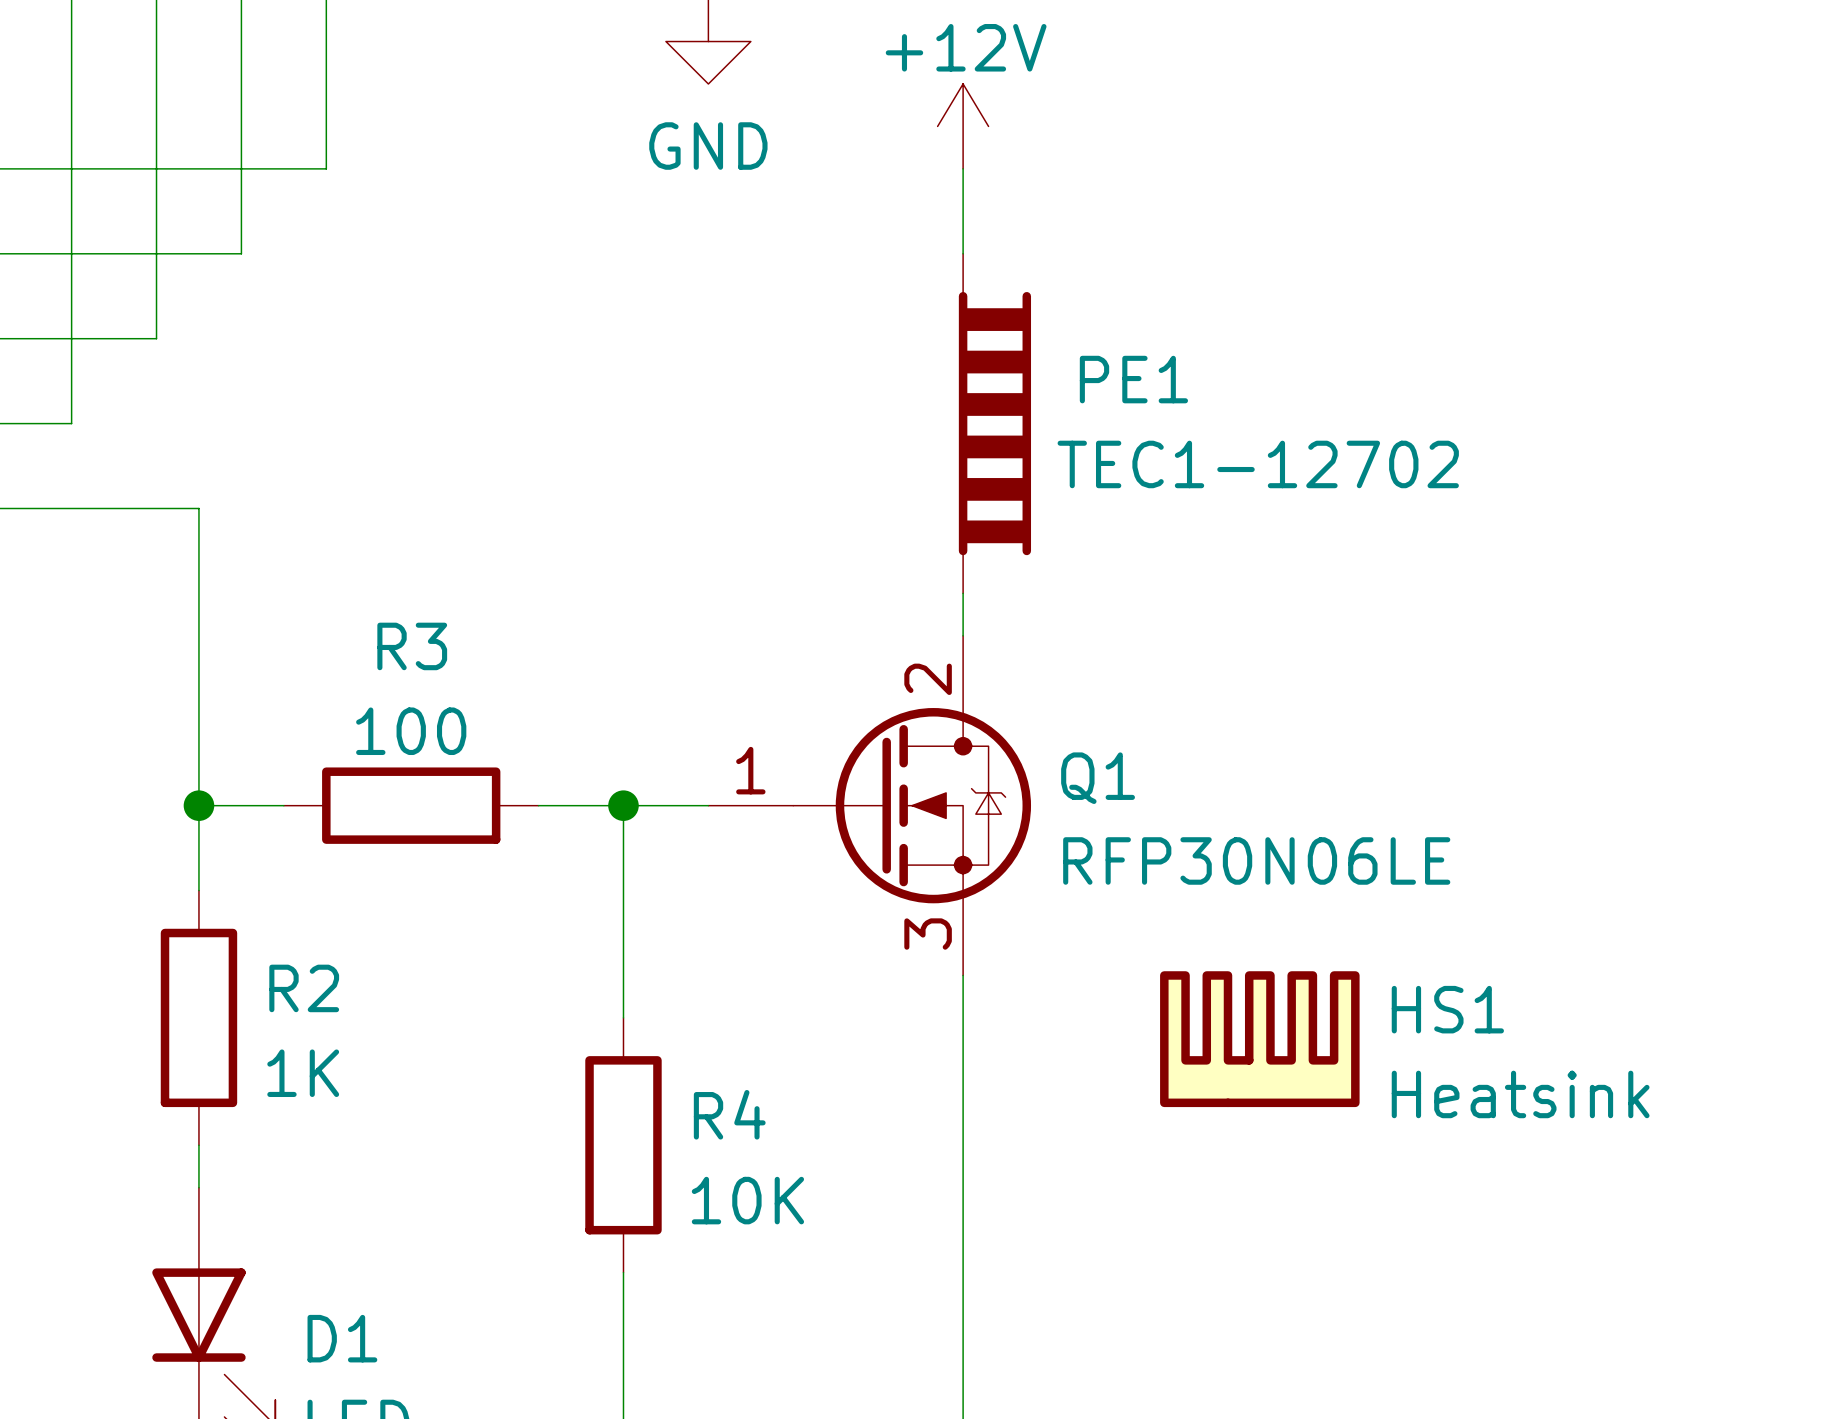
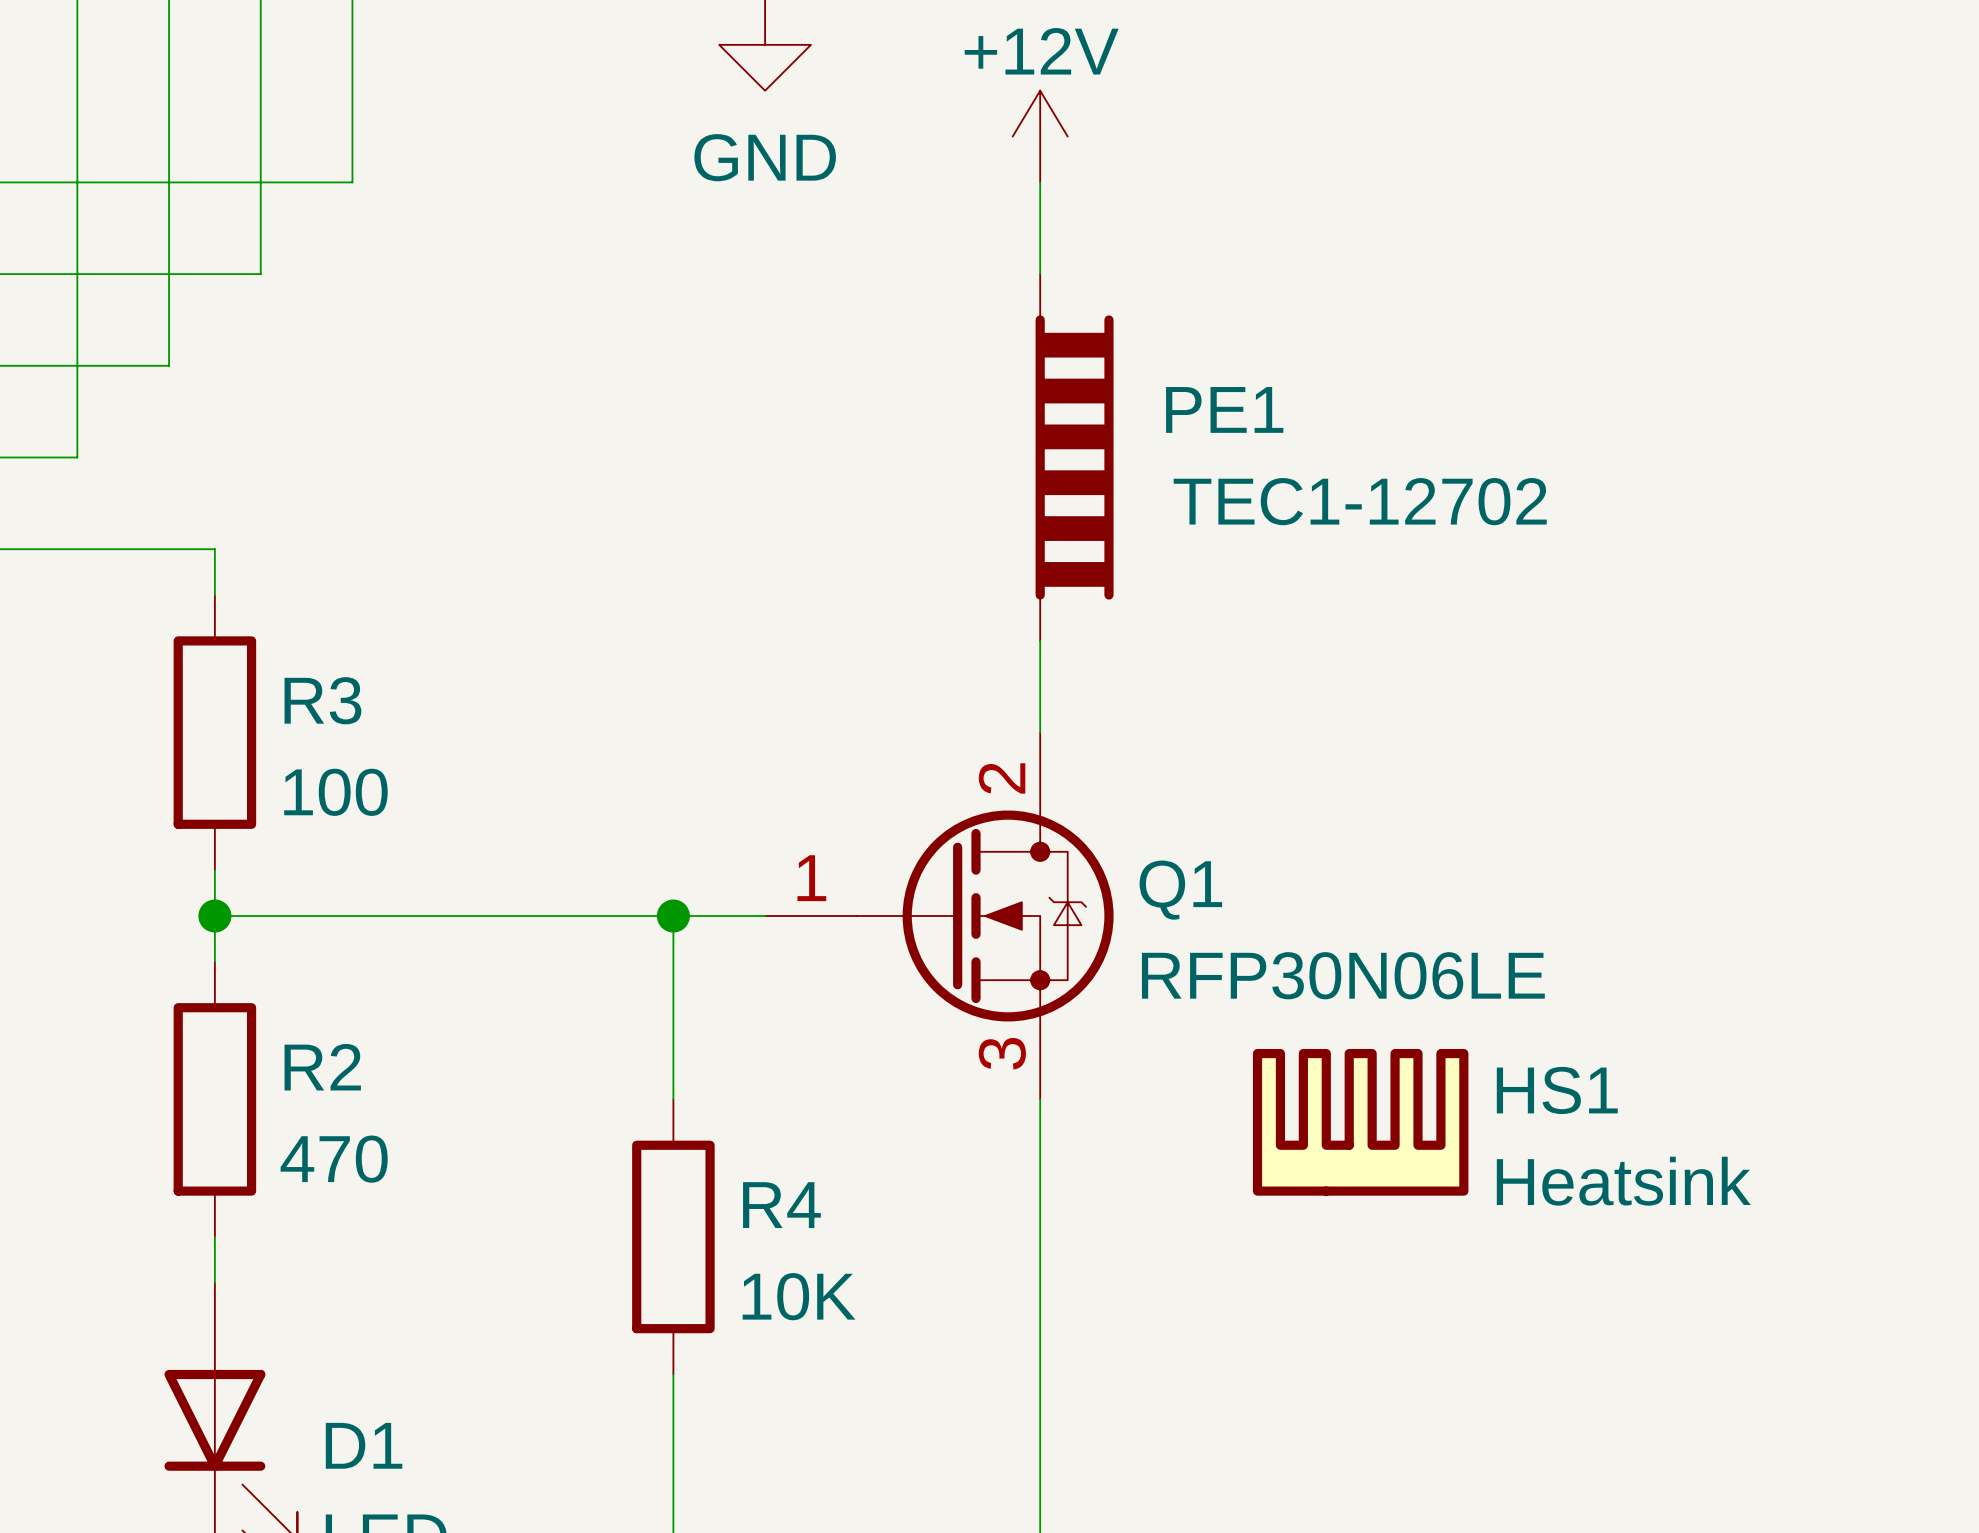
wire: (198, 550) (198, 805) (283, 805) -> none
R3 value position: 100 (411, 731) -> 100 (335, 792)
junction position: (198, 805) -> (214, 916)
R3 rotation: 0° (411, 805) -> 90° clockwise (214, 732)
R3 position: (411, 805) -> (214, 732)
wire: (538, 805) (708, 805) -> none
wire: (623, 805) (623, 848) -> none
junction position: (623, 805) -> (673, 916)
Q1 position: (869, 805) -> (939, 916)
wire: none -> (214, 916) (765, 916)
R2 value: 1K (303, 1073) -> 470 (334, 1159)

